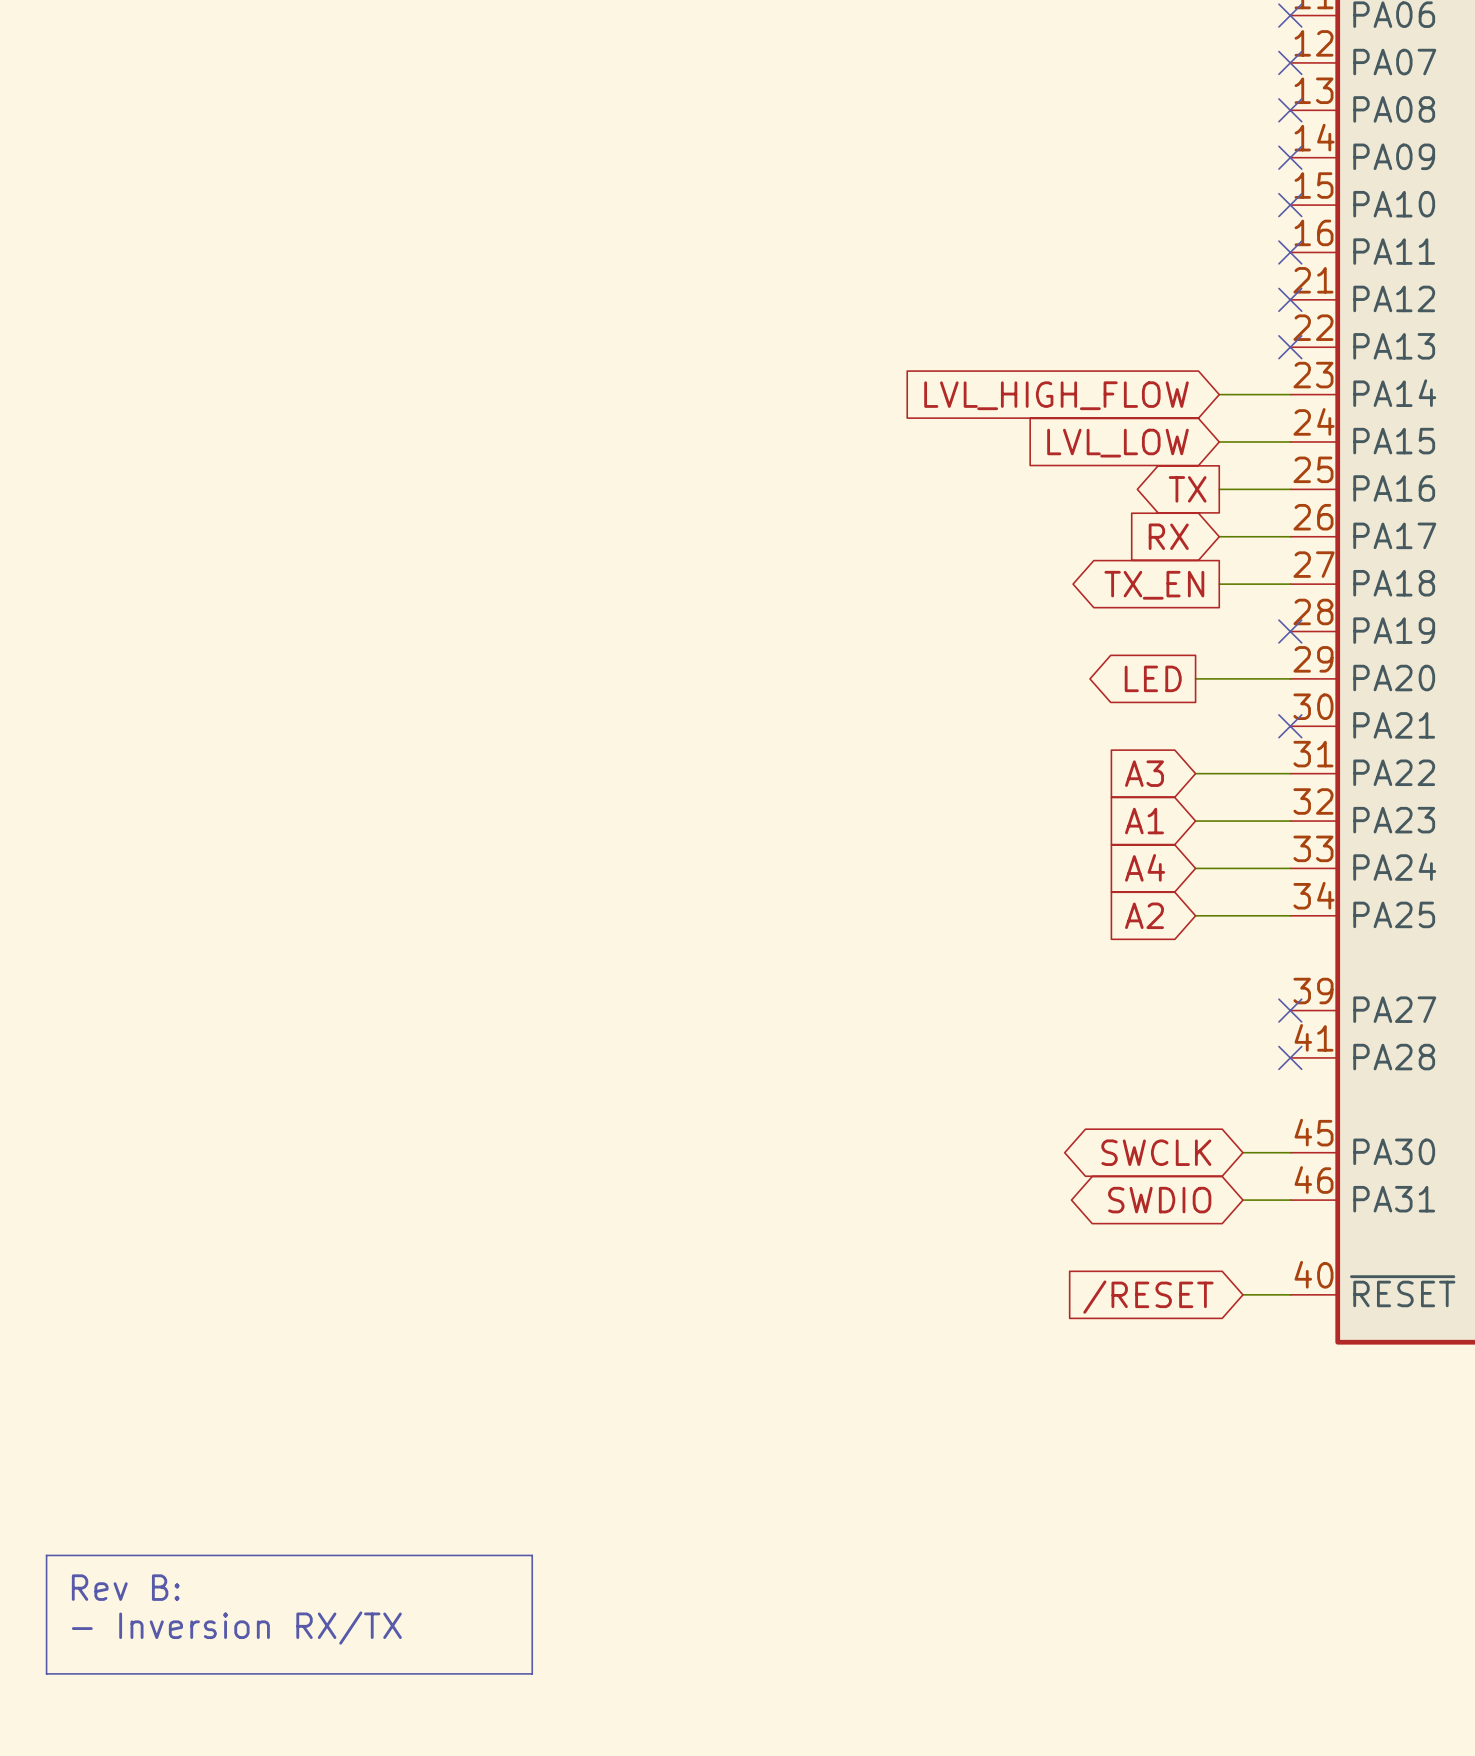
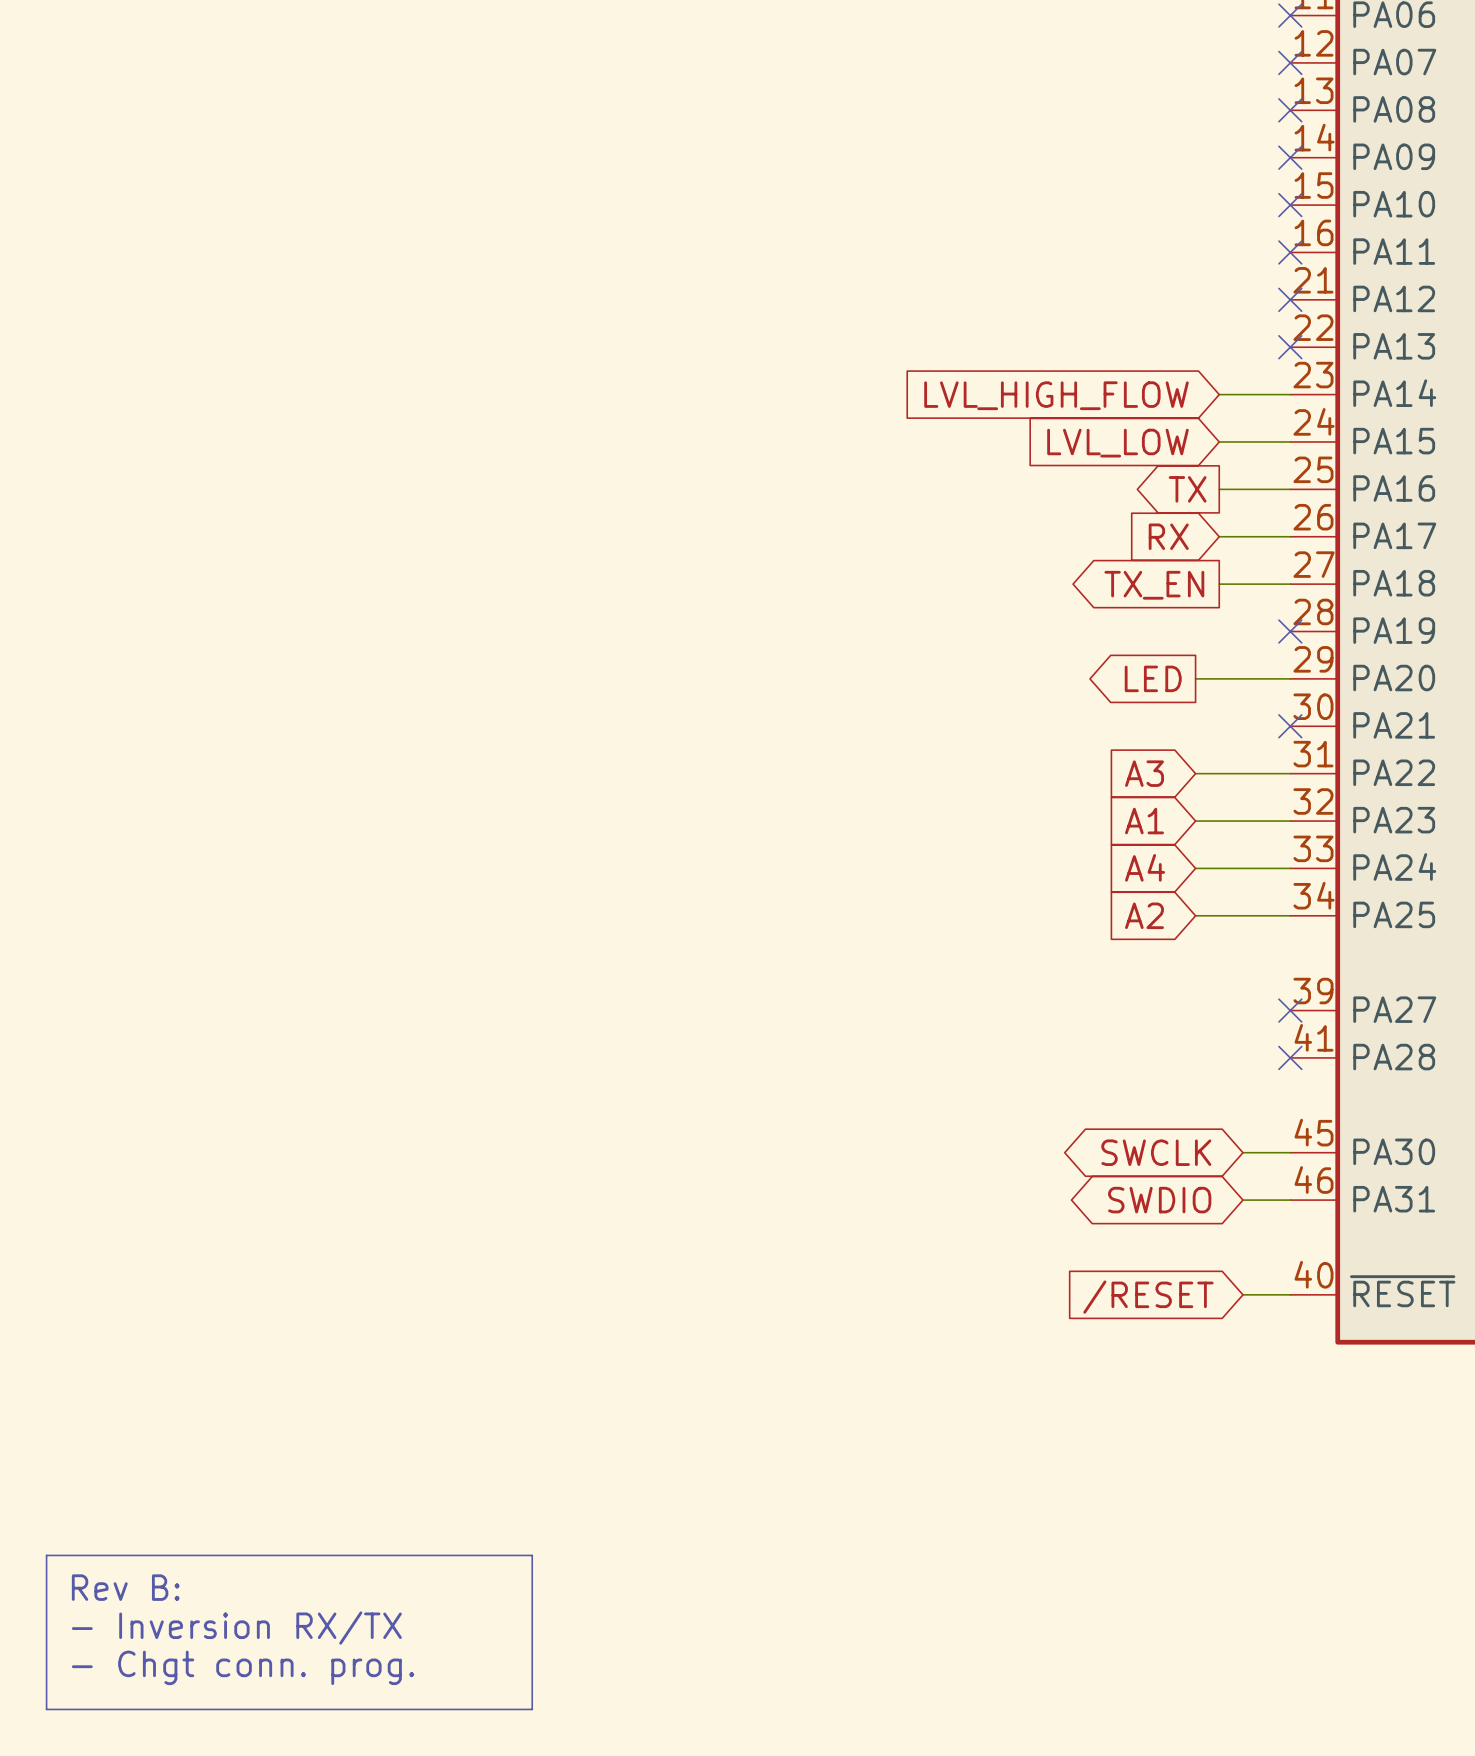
text: none -> - Chgt conn. prog. (243, 1667)
line: (46, 1673) (532, 1673) -> (46, 1673) (46, 1709) (532, 1709) (532, 1673)

